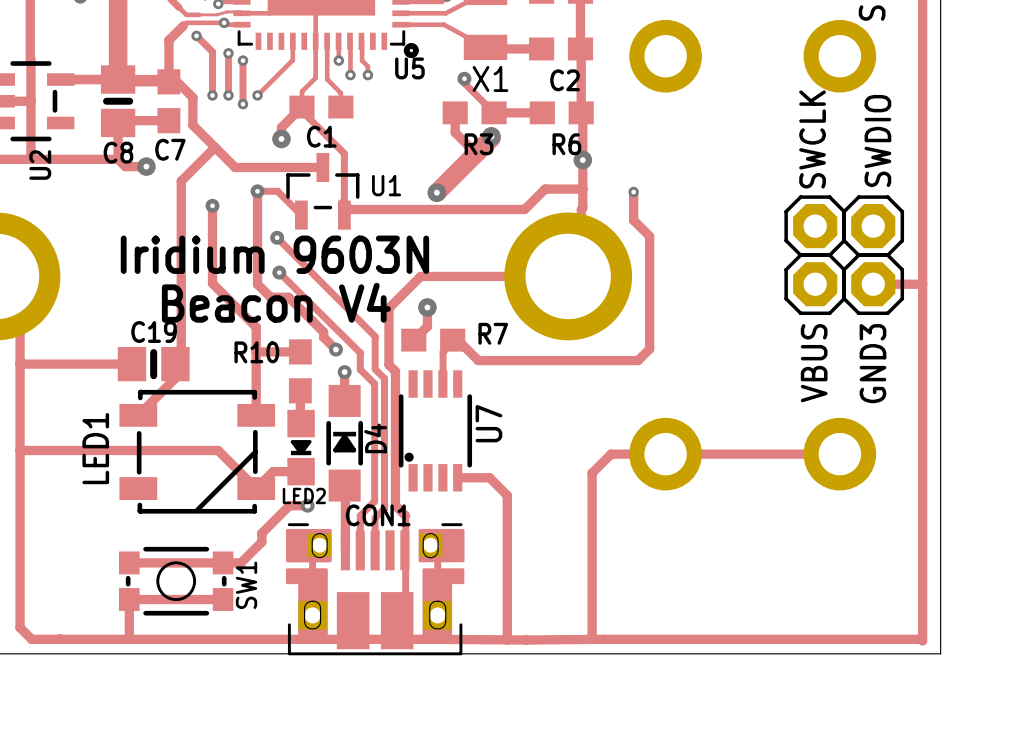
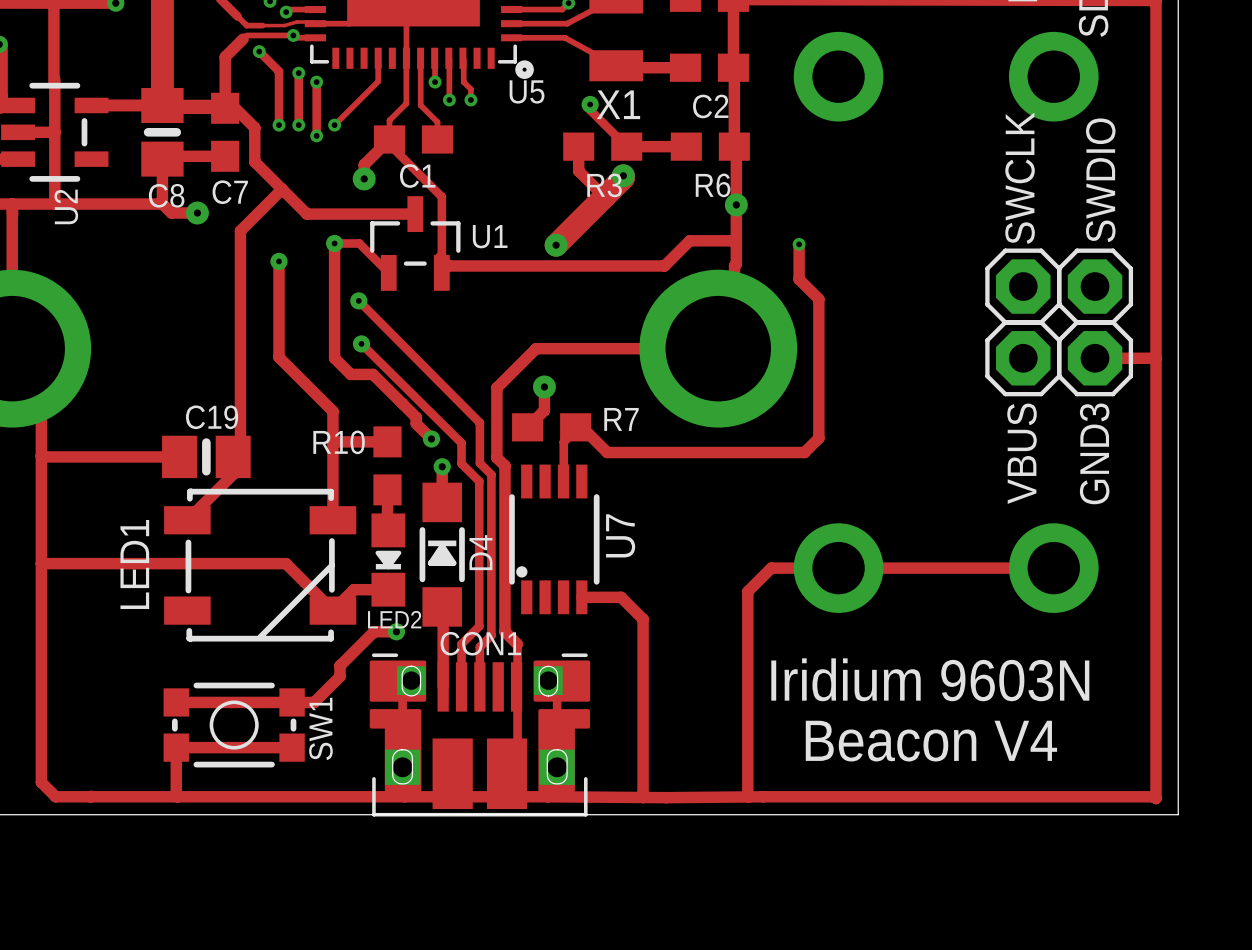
text position: Iridium 9603N (274, 254) -> Iridium 9603N (930, 679)
text position: Beacon V4 (276, 302) -> Beacon V4 (931, 741)

